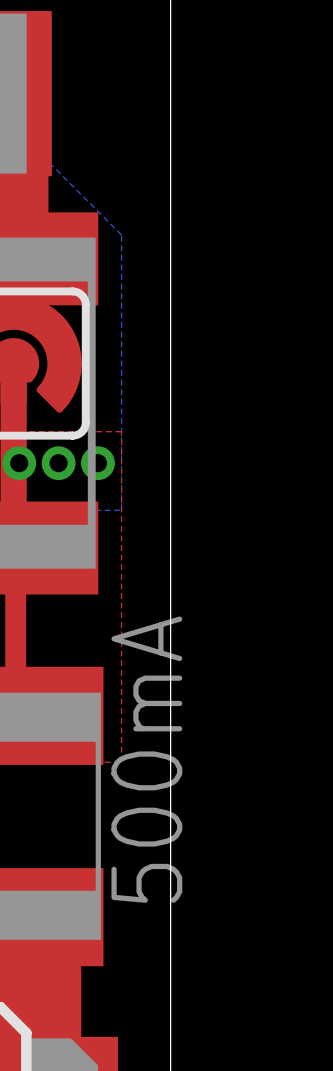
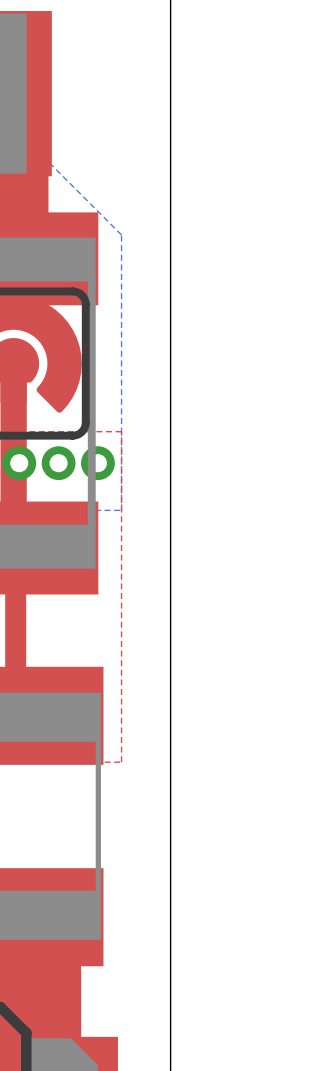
part value: 500mA (146, 759) -> none

